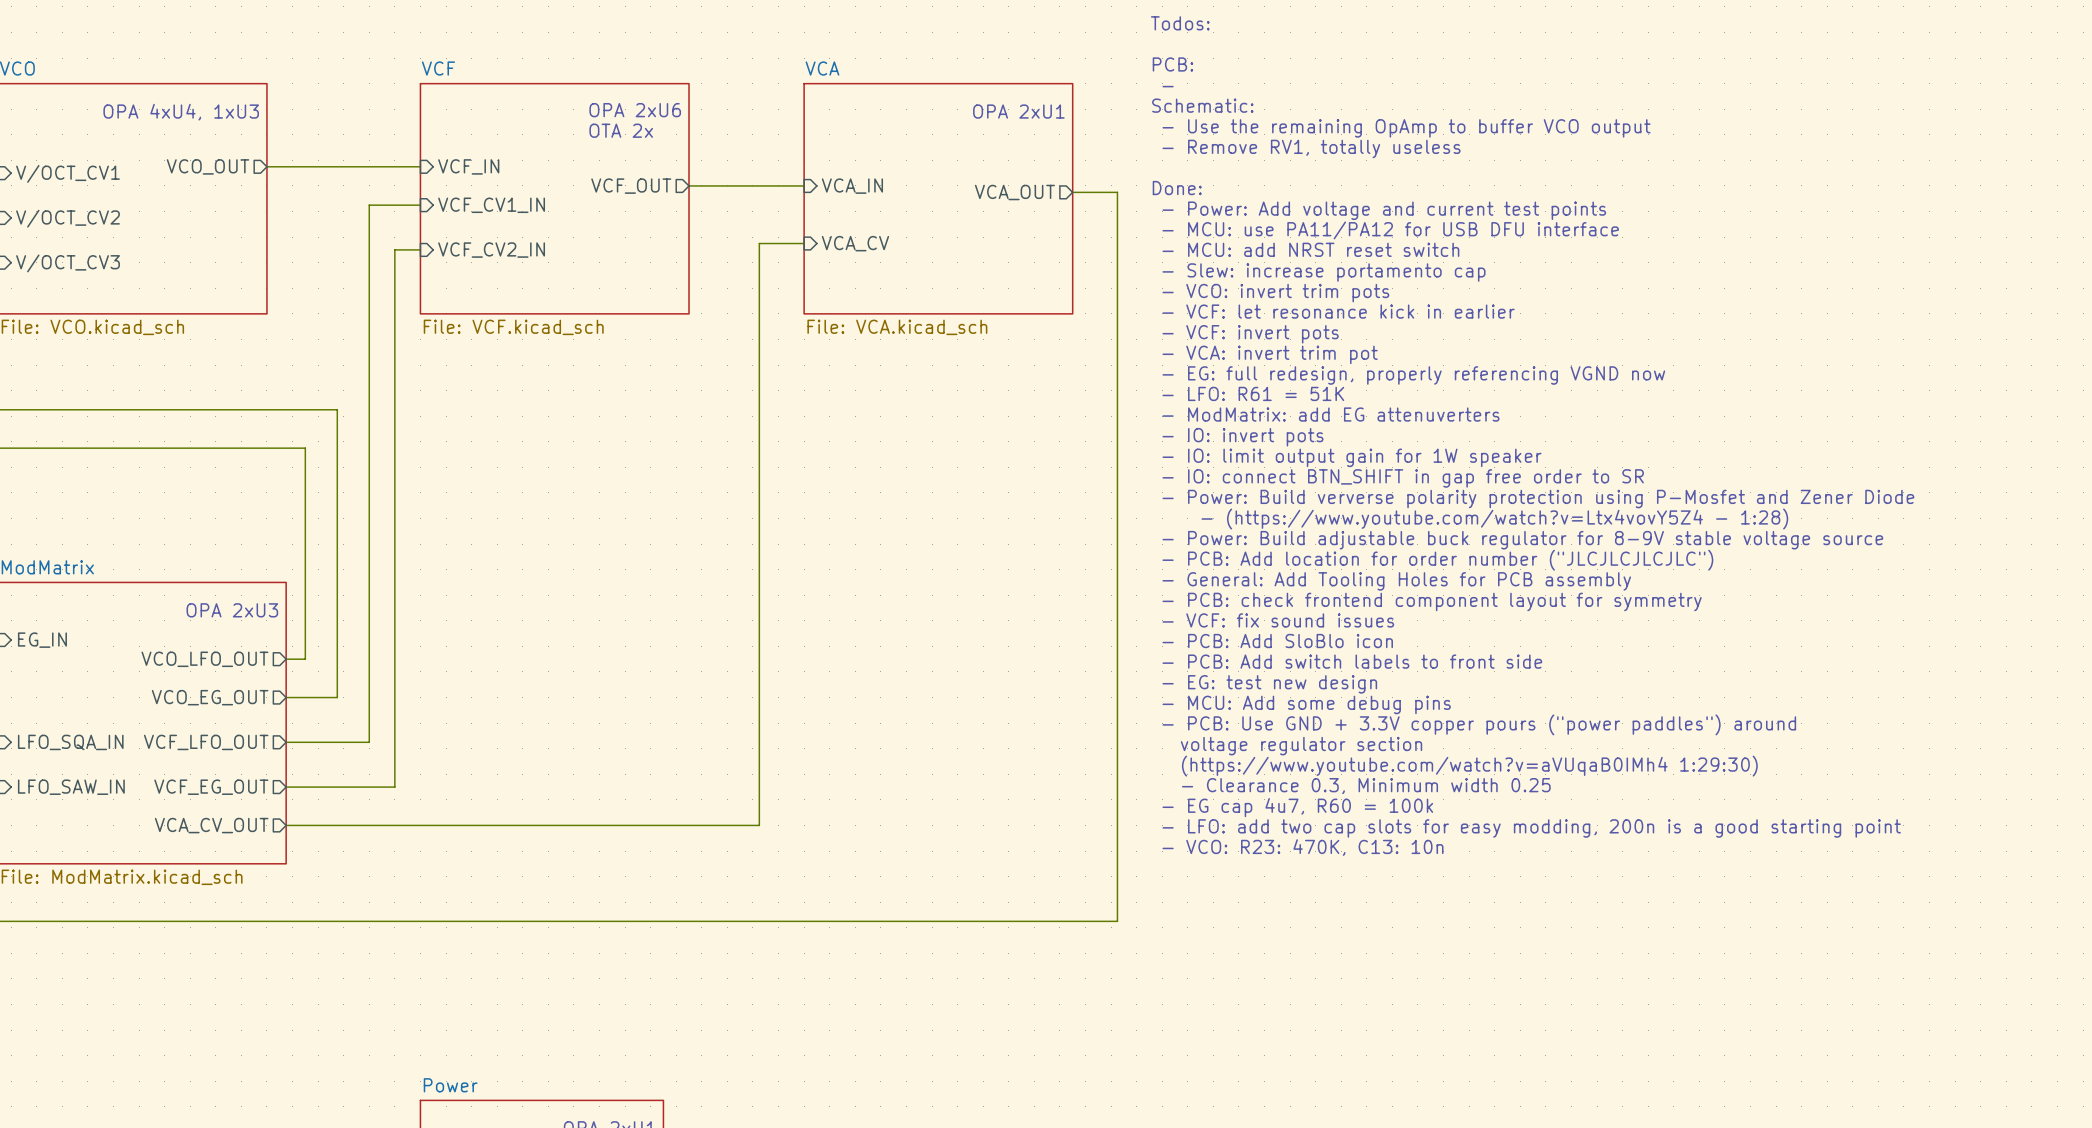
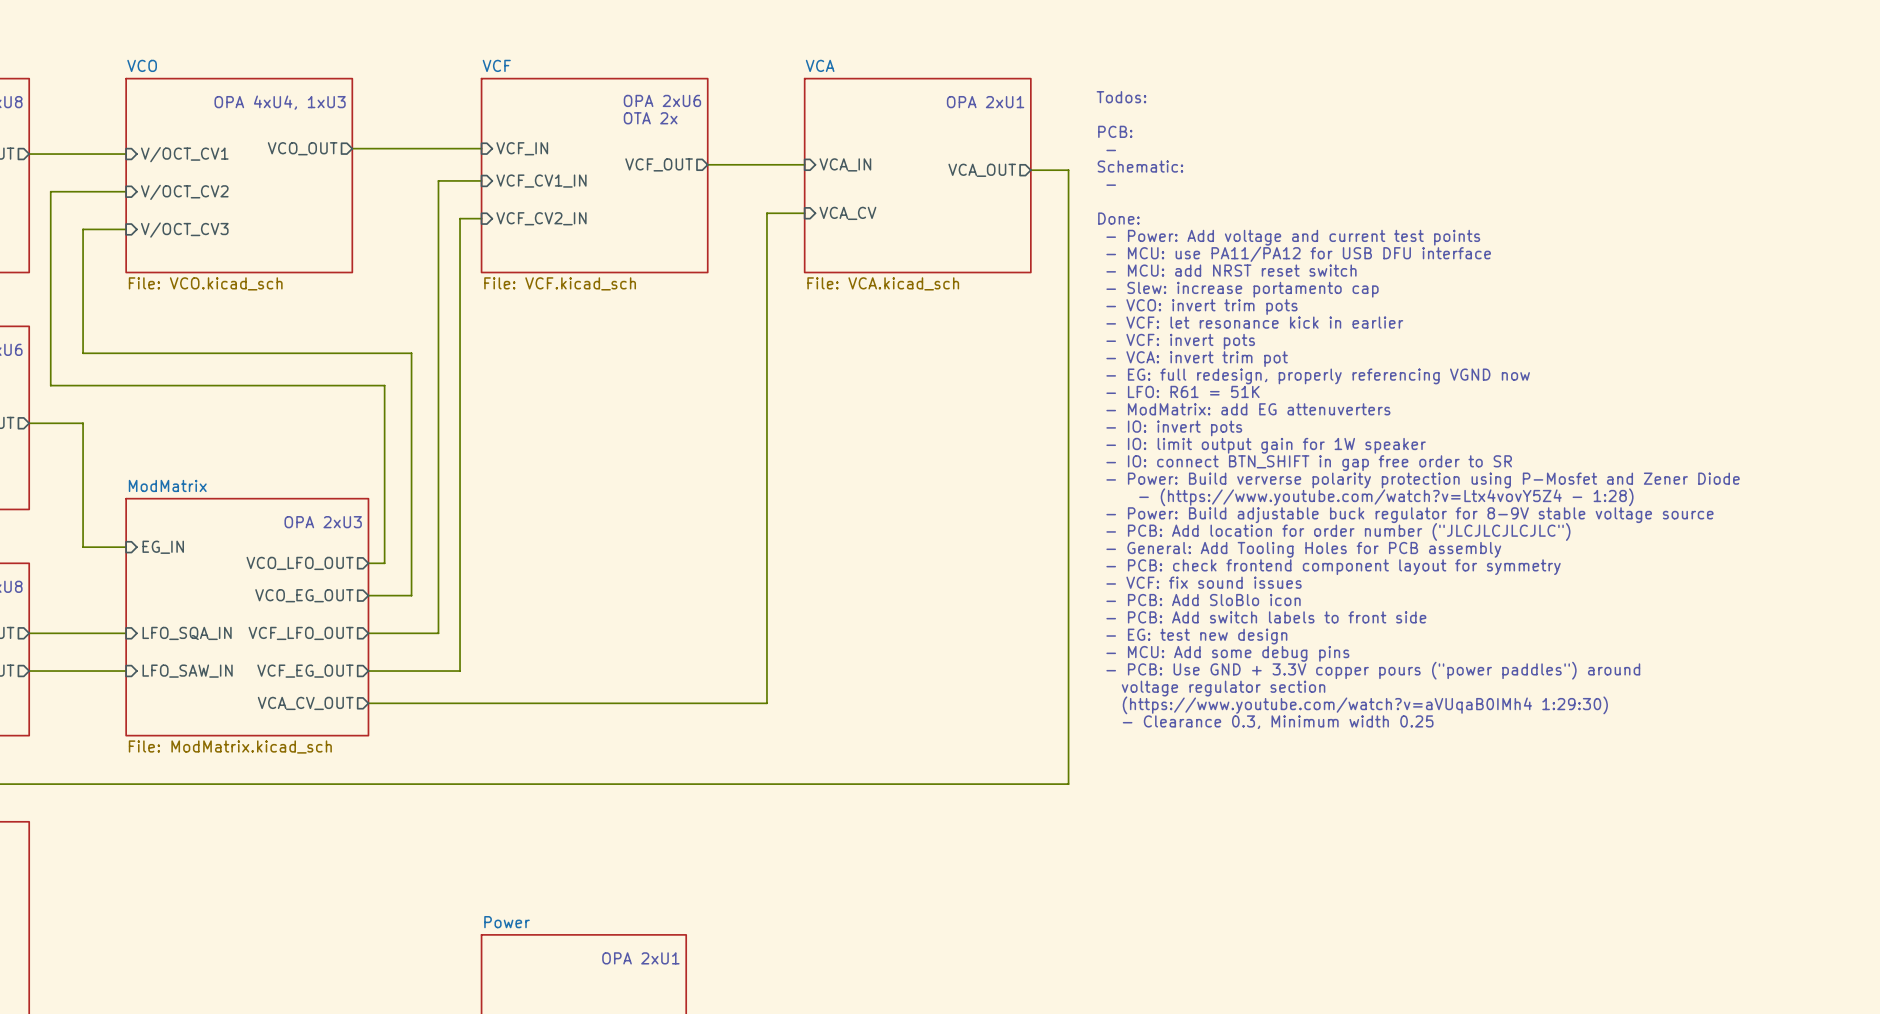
text: Todos: (1180, 23) -> none
text: PCB: (1172, 64) -> none
text position: - (1168, 86) -> - (1111, 150)
text: Schematic: (1202, 105) -> Todos: (1121, 97)
text: - Use the remaining OpAmp to buffer VCO output (1406, 128) -> none
text: - Remove RV1, totally useless (1311, 148) -> PCB: (1115, 131)
text: Done: (1177, 188) -> Schematic: (1140, 166)
text: - Power: Add voltage and current test points (1384, 210) -> - (1111, 185)
text: - MCU: use PA11/PA12 for USB DFU interface (1390, 230) -> none
text: - MCU: add NRST reset switch (1310, 249) -> Done: (1118, 218)
text: - Slew: increase portamento cap (1324, 272) -> - Power: Add voltage and current test points (1293, 237)
text: - VCO: invert trim pots (1275, 293) -> - MCU: use PA11/PA12 for USB DFU interface (1298, 254)
text: - VCF: let resonance kick in earlier (1338, 311) -> - MCU: add NRST reset switch (1231, 270)
text: - VCF: invert pots (1250, 334) -> - Slew: increase portamento cap (1242, 289)
text: - VCA: invert trim pot (1270, 354) -> - VCO: invert trim pots (1201, 307)
text: - EG: full redesign, properly referencing VGND now (1413, 375) -> - VCF: let resonance kick in earlier (1254, 322)
text: - LFO: R61 = 51K (1253, 393) -> - VCF: invert pots (1180, 341)
text: - ModMatrix: add EG attenuverters (1331, 414) -> - VCA: invert trim pot (1197, 359)
text: - IO: invert pots (1243, 437) -> - EG: full redesign, properly referencing VGND now (1318, 376)
text: - IO: limit output gain for 1W speaker (1352, 457) -> - LFO: R61 = 51K (1183, 391)
text: - IO: connect BTN_SHIFT in gap free order to SR (1403, 478) -> - ModMatrix: add EG attenuverters (1248, 409)
text: - Power: Build ververse polarity protection using P-Mosfet and Zener Diode (1538, 499) -> - IO: invert pots (1174, 428)
text: - (https://www.youtube.com/watch?v=Ltx4vovY5Z4 - 1:28) (1494, 519) -> - IO: limit output gain for 1W speaker (1266, 445)
text: - Power: Build adjustable buck regulator for 8-9V stable voltage source (1522, 540) -> - IO: connect BTN_SHIFT in gap free order to SR (1309, 463)
text: - PCB: Add location for order number ("JLCJLCJLCJLC") (1437, 560) -> - Power: Build ververse polarity protection using P-Mosfet and Zener Diode (1423, 480)
text: - General: Add Tooling Holes for PCB assembly (1396, 581) -> - (https://www.youtube.com/watch?v=Ltx4vovY5Z4 - 1:28) (1386, 497)
text: - PCB: check frontend component layout for symmetry (1432, 601) -> - Power: Build adjustable buck regulator for 8-9V stable voltage source (1409, 515)
text: - VCF: fix sound issues (1278, 620) -> - PCB: Add location for order number ("JLCJLCJLCJLC") (1338, 531)
text: - PCB: Add SloBlo icon (1277, 641) -> - General: Add Tooling Holes for PCB assembly (1303, 549)
text: - PCB: Add switch labels to front side (1352, 661) -> - PCB: check frontend component layout for symmetry (1333, 567)
text: - EG: test new design (1269, 684) -> - VCF: fix sound issues (1204, 582)
text: - MCU: Add some debug pins (1306, 704) -> - PCB: Add SloBlo icon (1203, 600)
text: - PCB: Use GND + 3.3V copper pours ("power paddles") around (1479, 724) -> - PCB: Add switch labels to front side (1266, 617)
text: voltage regulator section (1301, 746) -> - EG: test new design (1196, 636)
text: (https://www.youtube.com/watch?v=aVUqaB0IMh4 1:29:30) (1469, 766) -> - MCU: Add some debug pins (1227, 653)
text: - Clearance 0.3, Minimum width 0.25 (1366, 786) -> - PCB: Use GND + 3.3V copper pours ("power paddles") around (1373, 670)
text: - EG cap 4u7, R60 = 100k (1297, 807) -> voltage regulator section (1223, 688)
text: - LFO: add two cap slots for easy modding, 200n is a good starting point (1531, 828) -> (https://www.youtube.com/watch?v=aVUqaB0IMh4 1:29:30) (1365, 705)
text: - VCO: R23: 470K, C13: 10n (1302, 847) -> - Clearance 0.3, Minimum width 0.25 (1278, 722)

